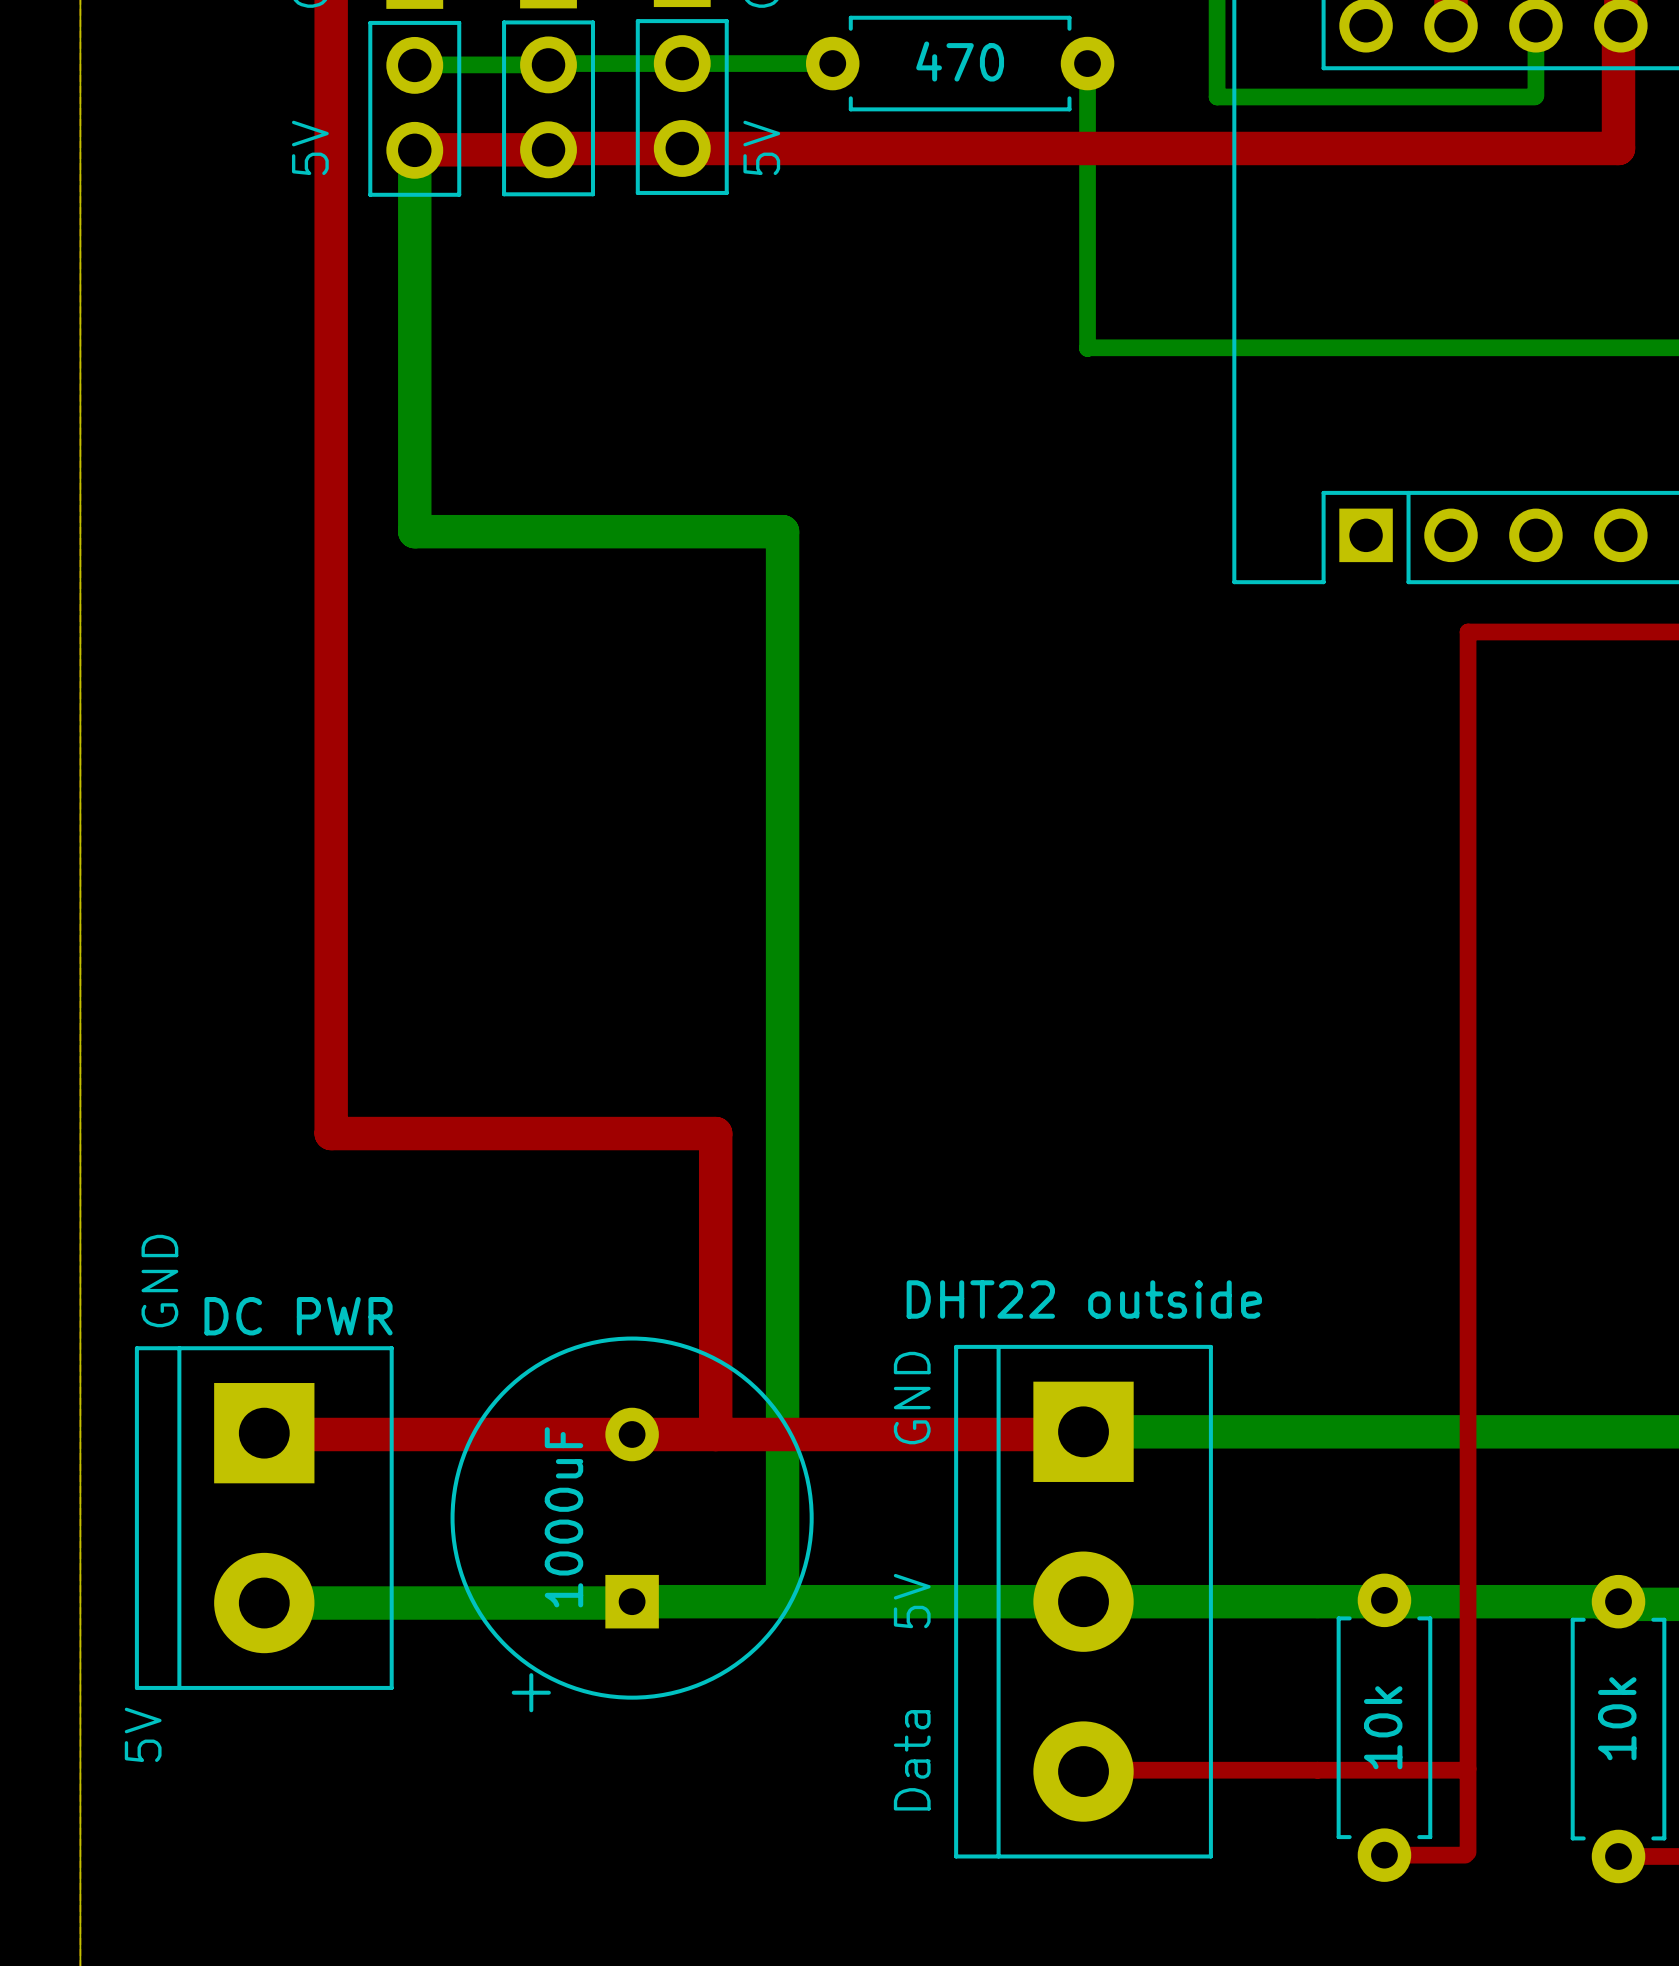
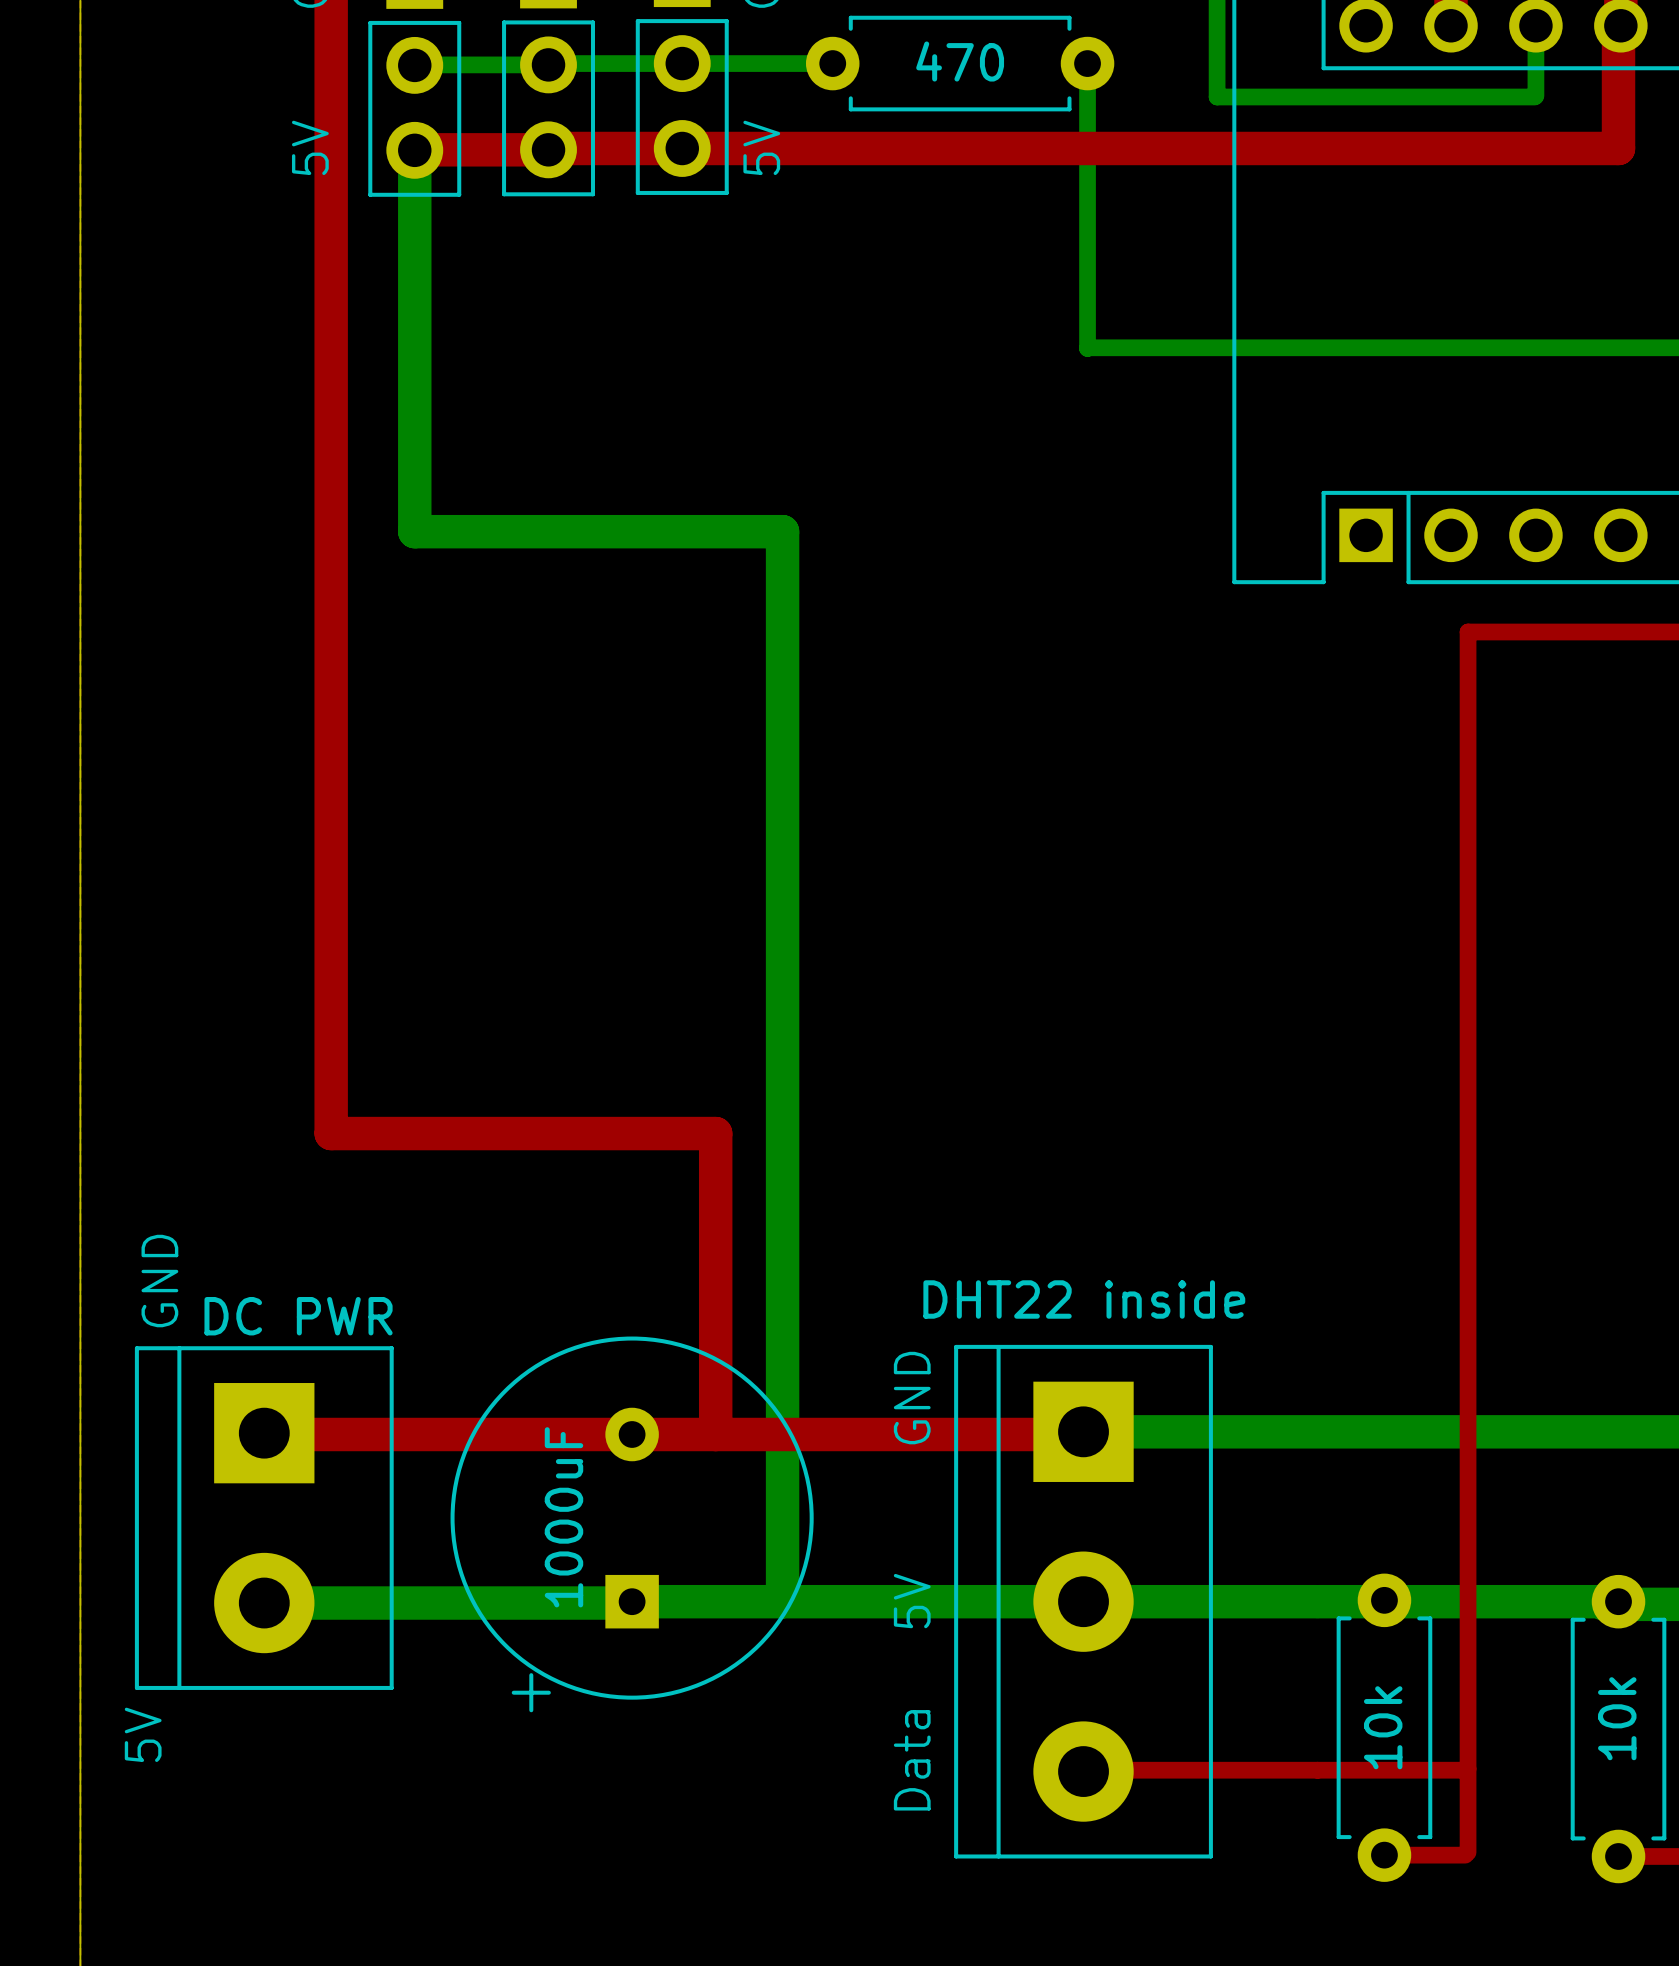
part value: DHT22 outside (1084, 1299) -> DHT22 inside (1084, 1299)

